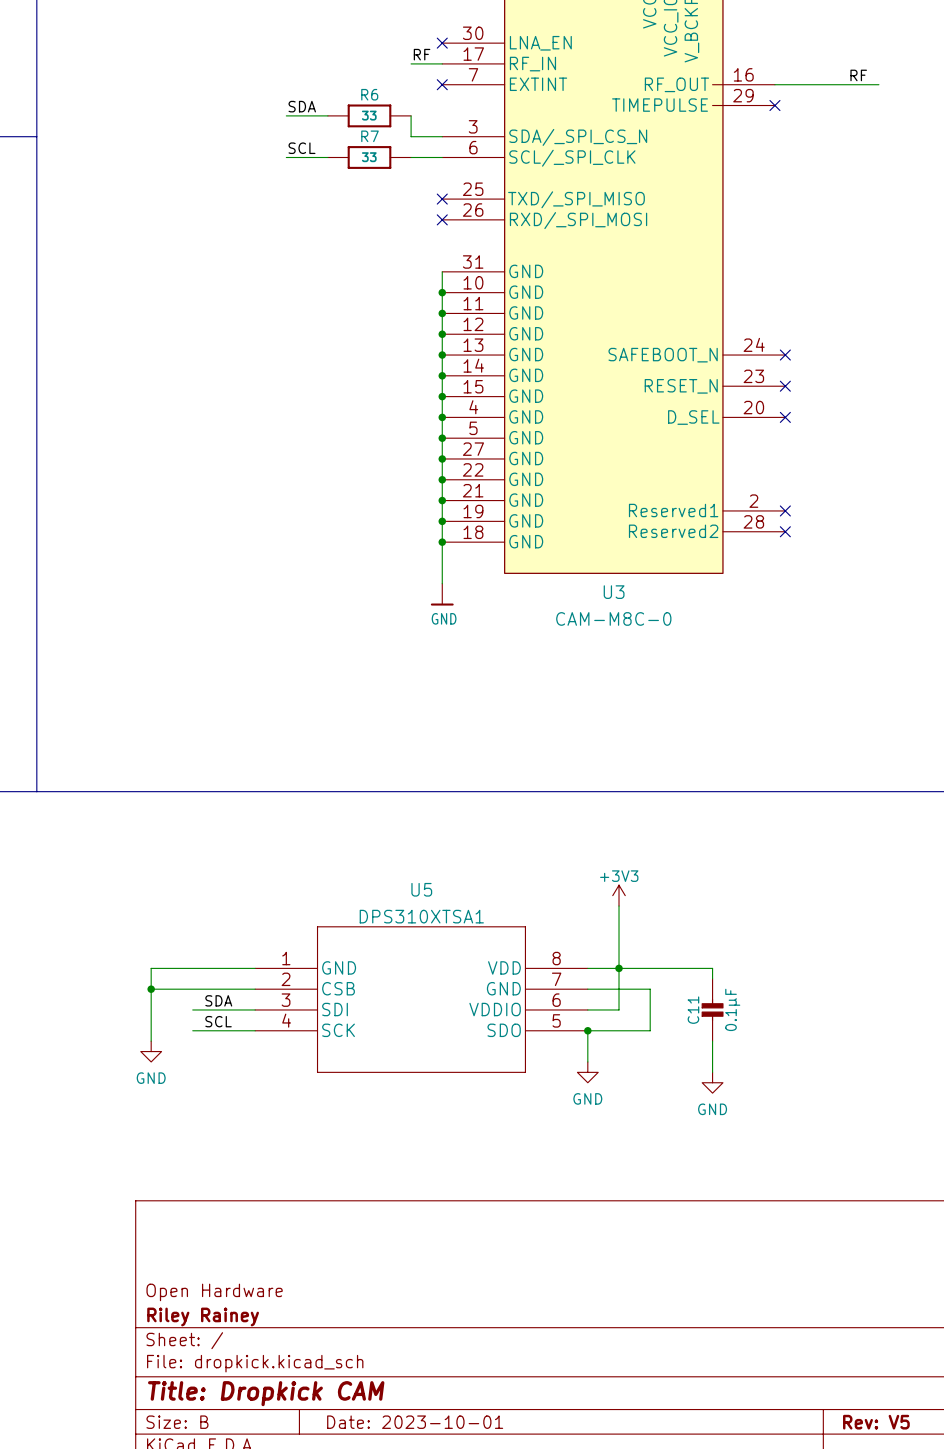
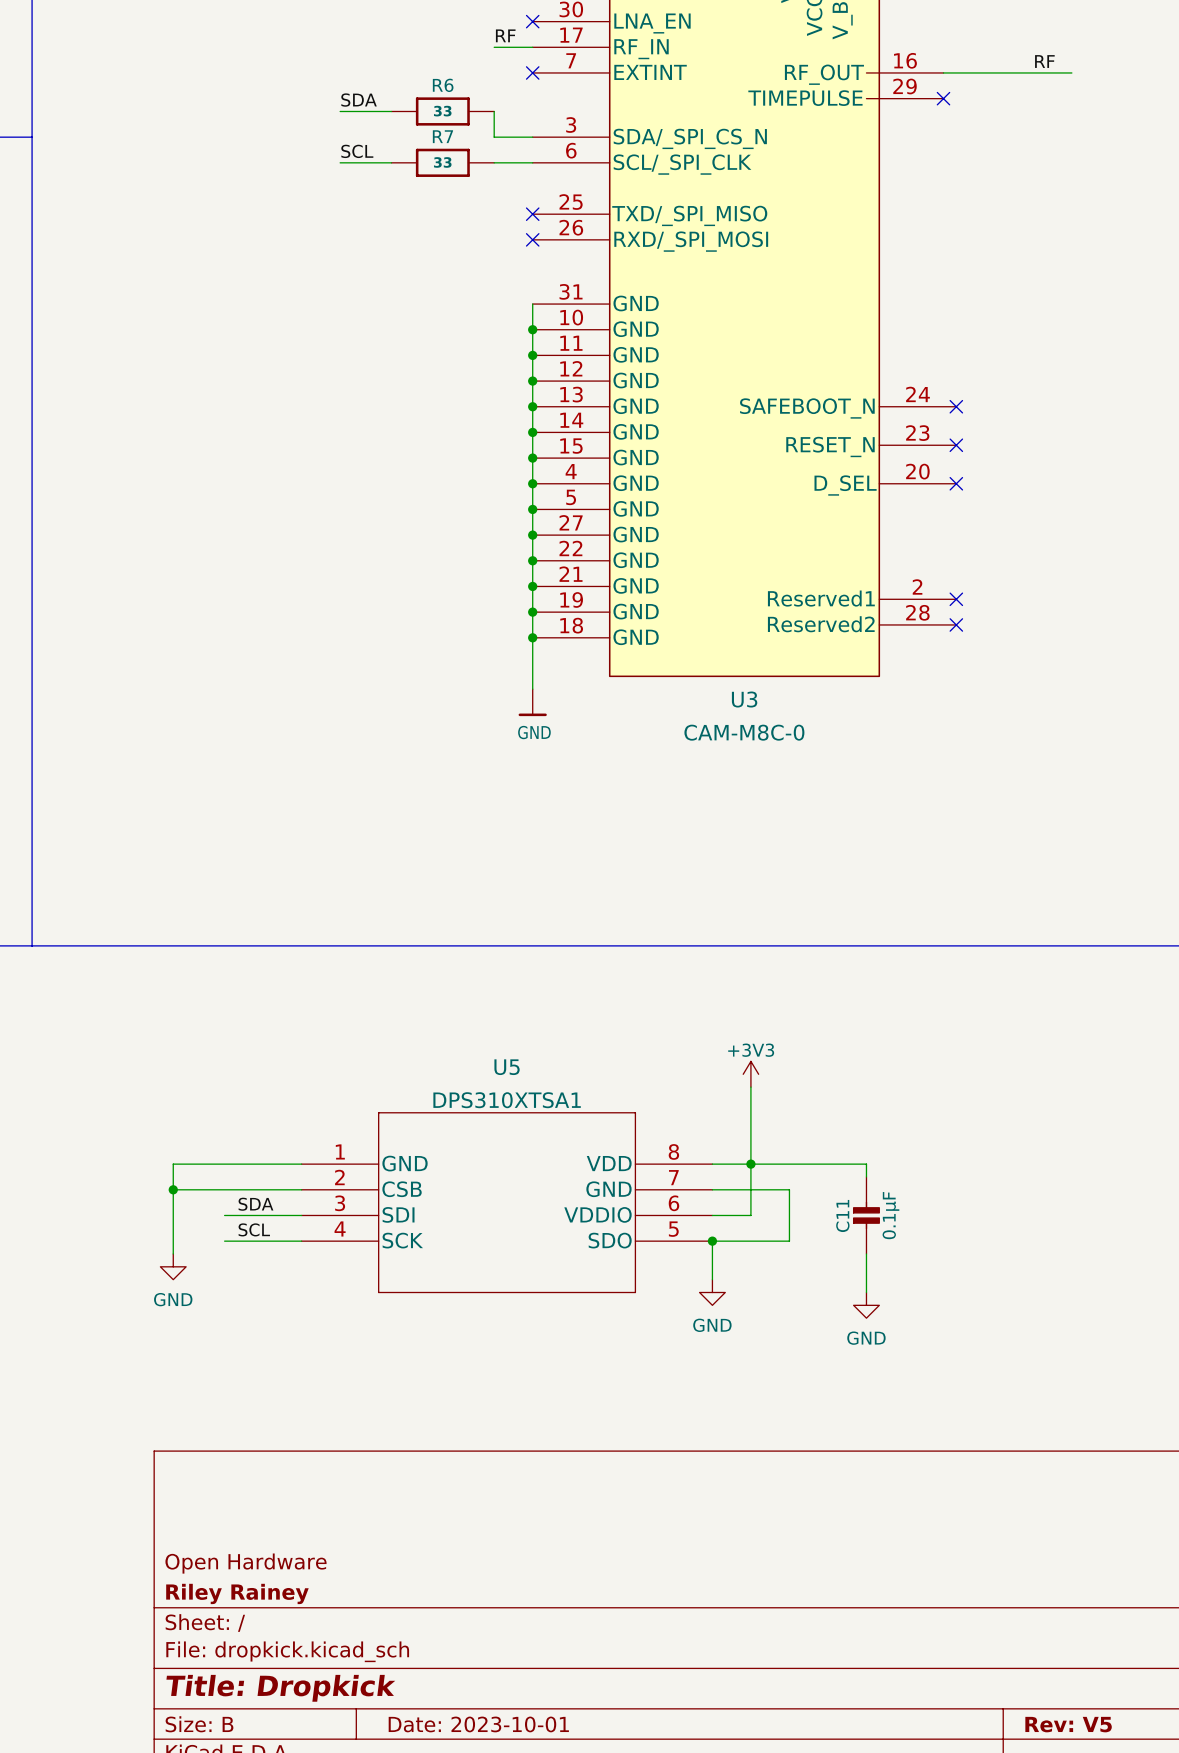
title block: Title: Dropkick CAM (266, 1393) -> Title: Dropkick (280, 1688)

